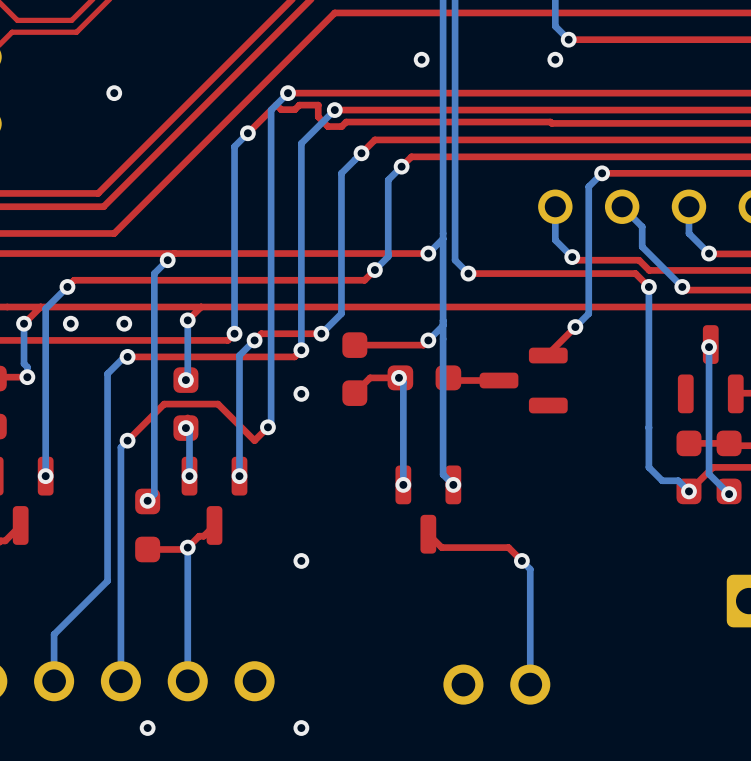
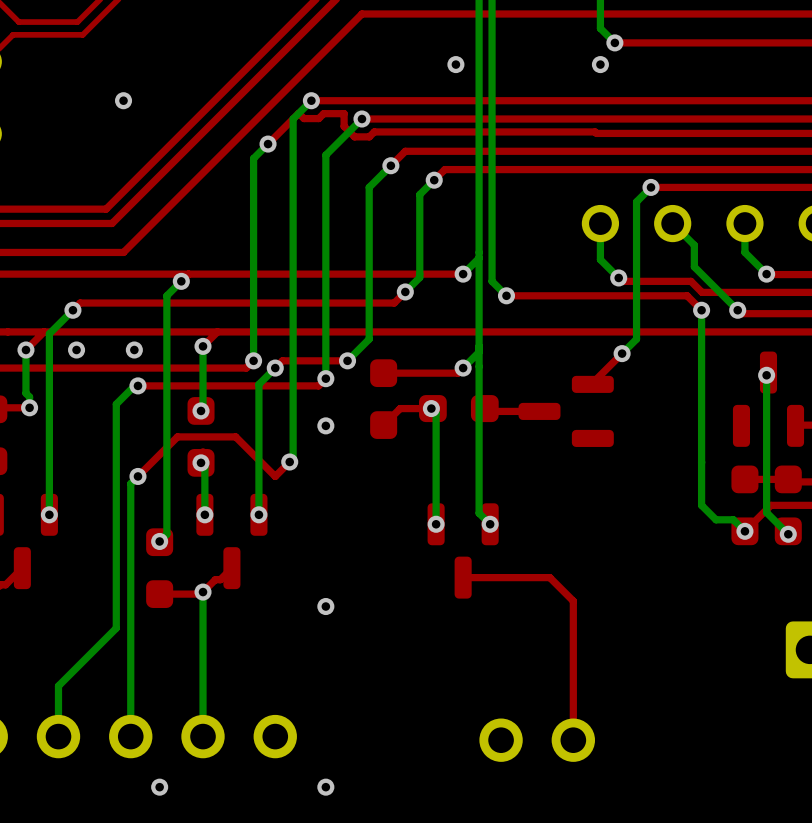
top track: (428, 534) (441, 547) (508, 547) (521, 560) -> (463, 577) (549, 577) (573, 601) (573, 740)
bottom track: (521, 560) (530, 569) (530, 684) -> none
via: (521, 560) -> none

